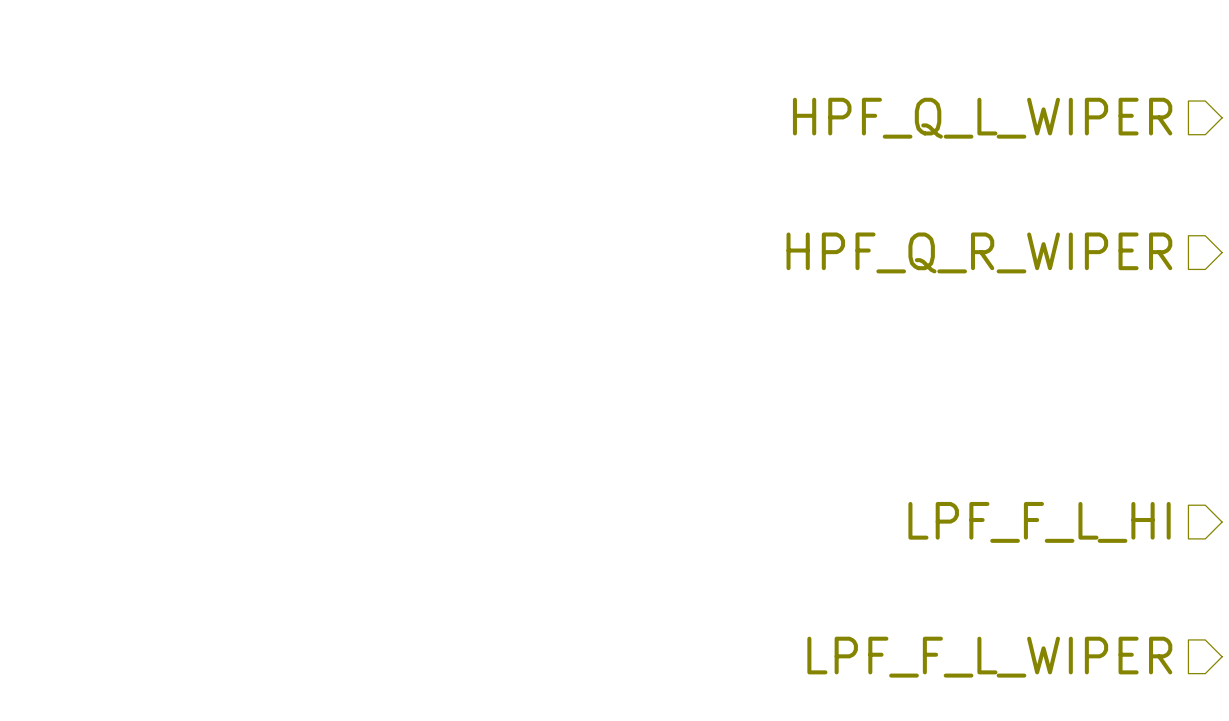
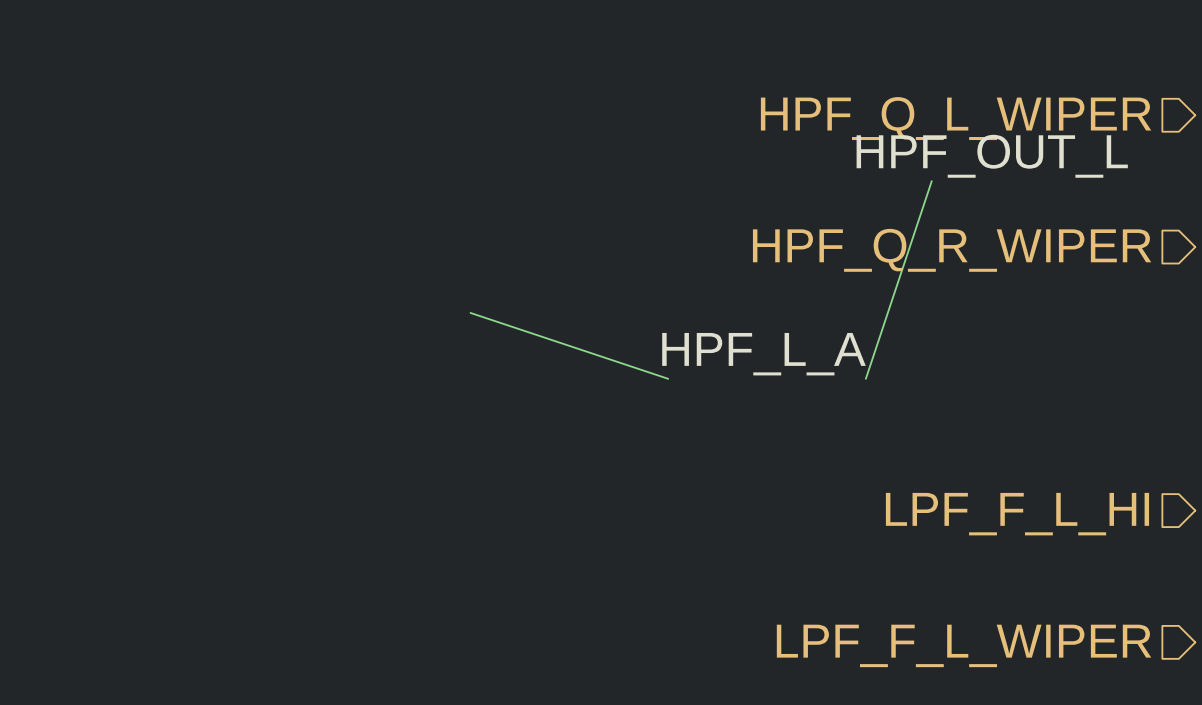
label: none -> HPF_OUT_L (992, 156)
wire: none -> (931, 181) (865, 378)
wire: none -> (470, 312) (668, 378)
label: none -> HPF_L_A (763, 354)

